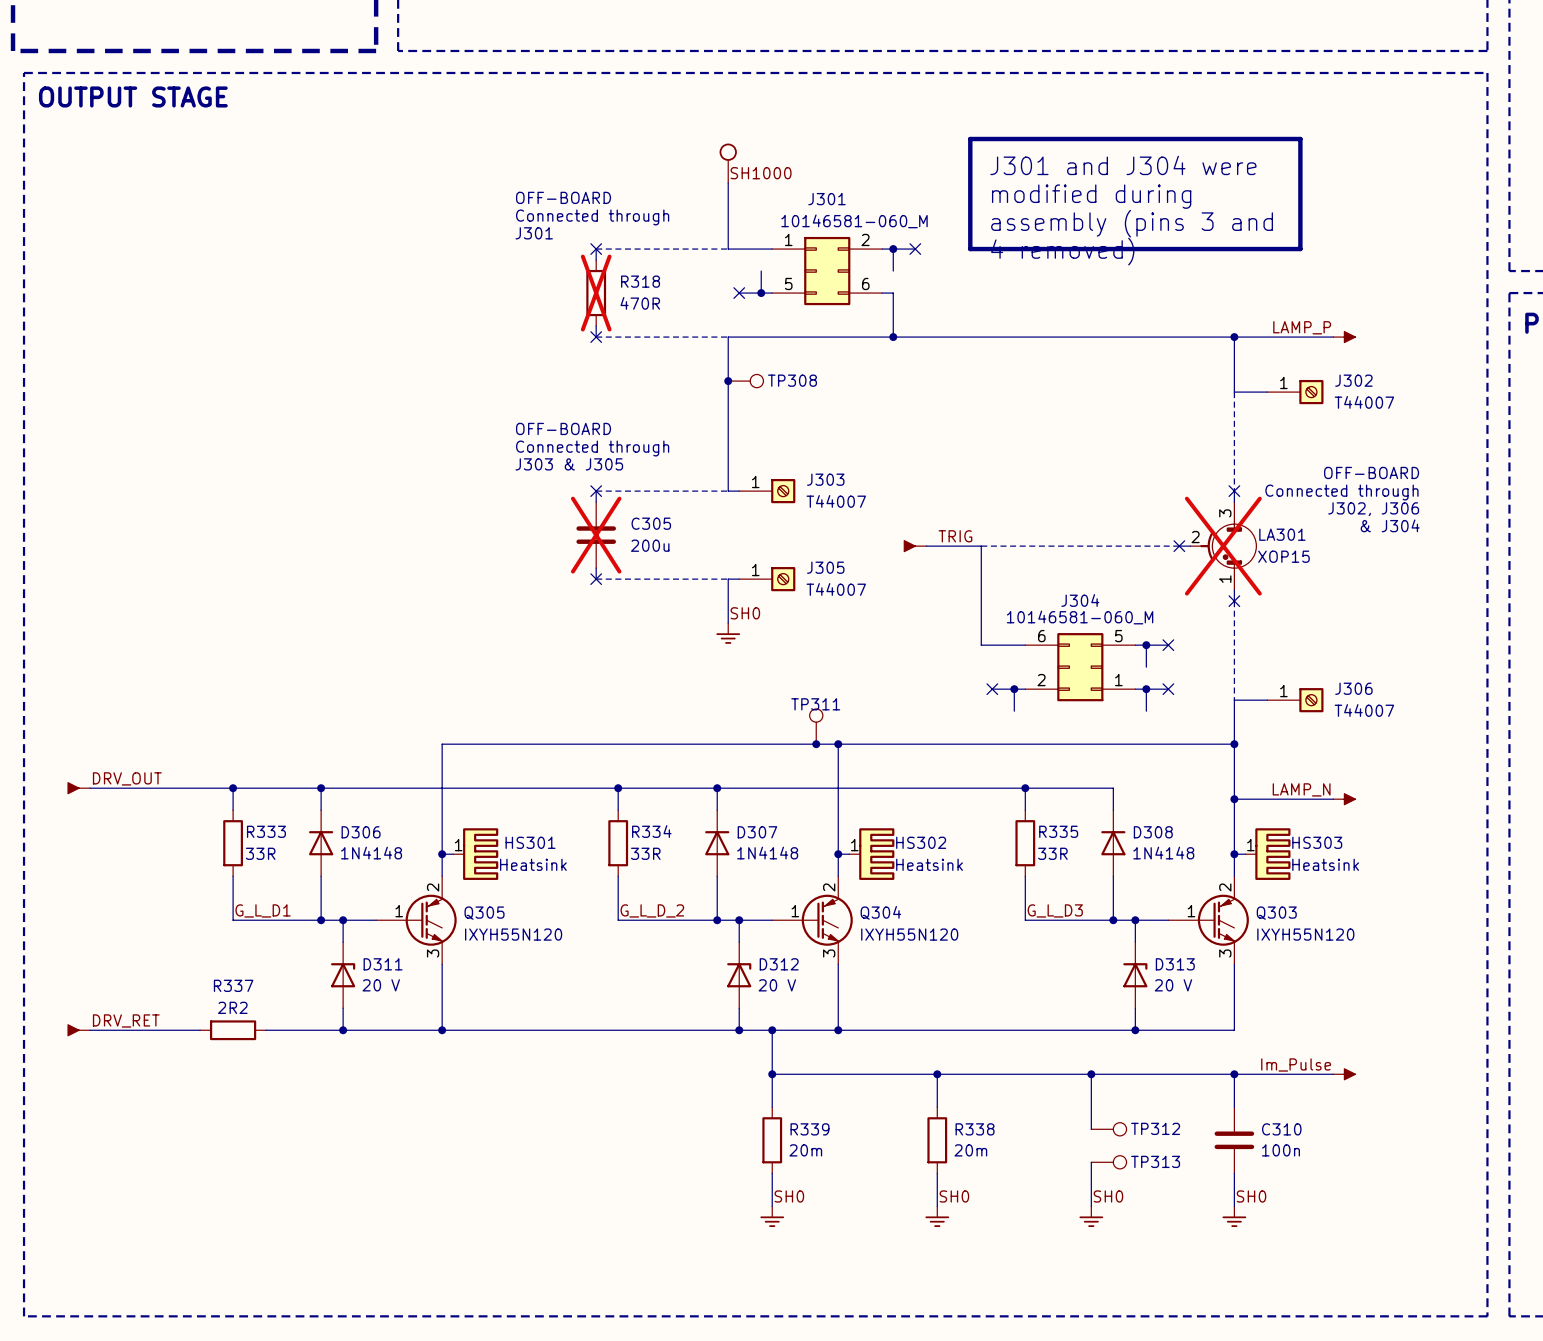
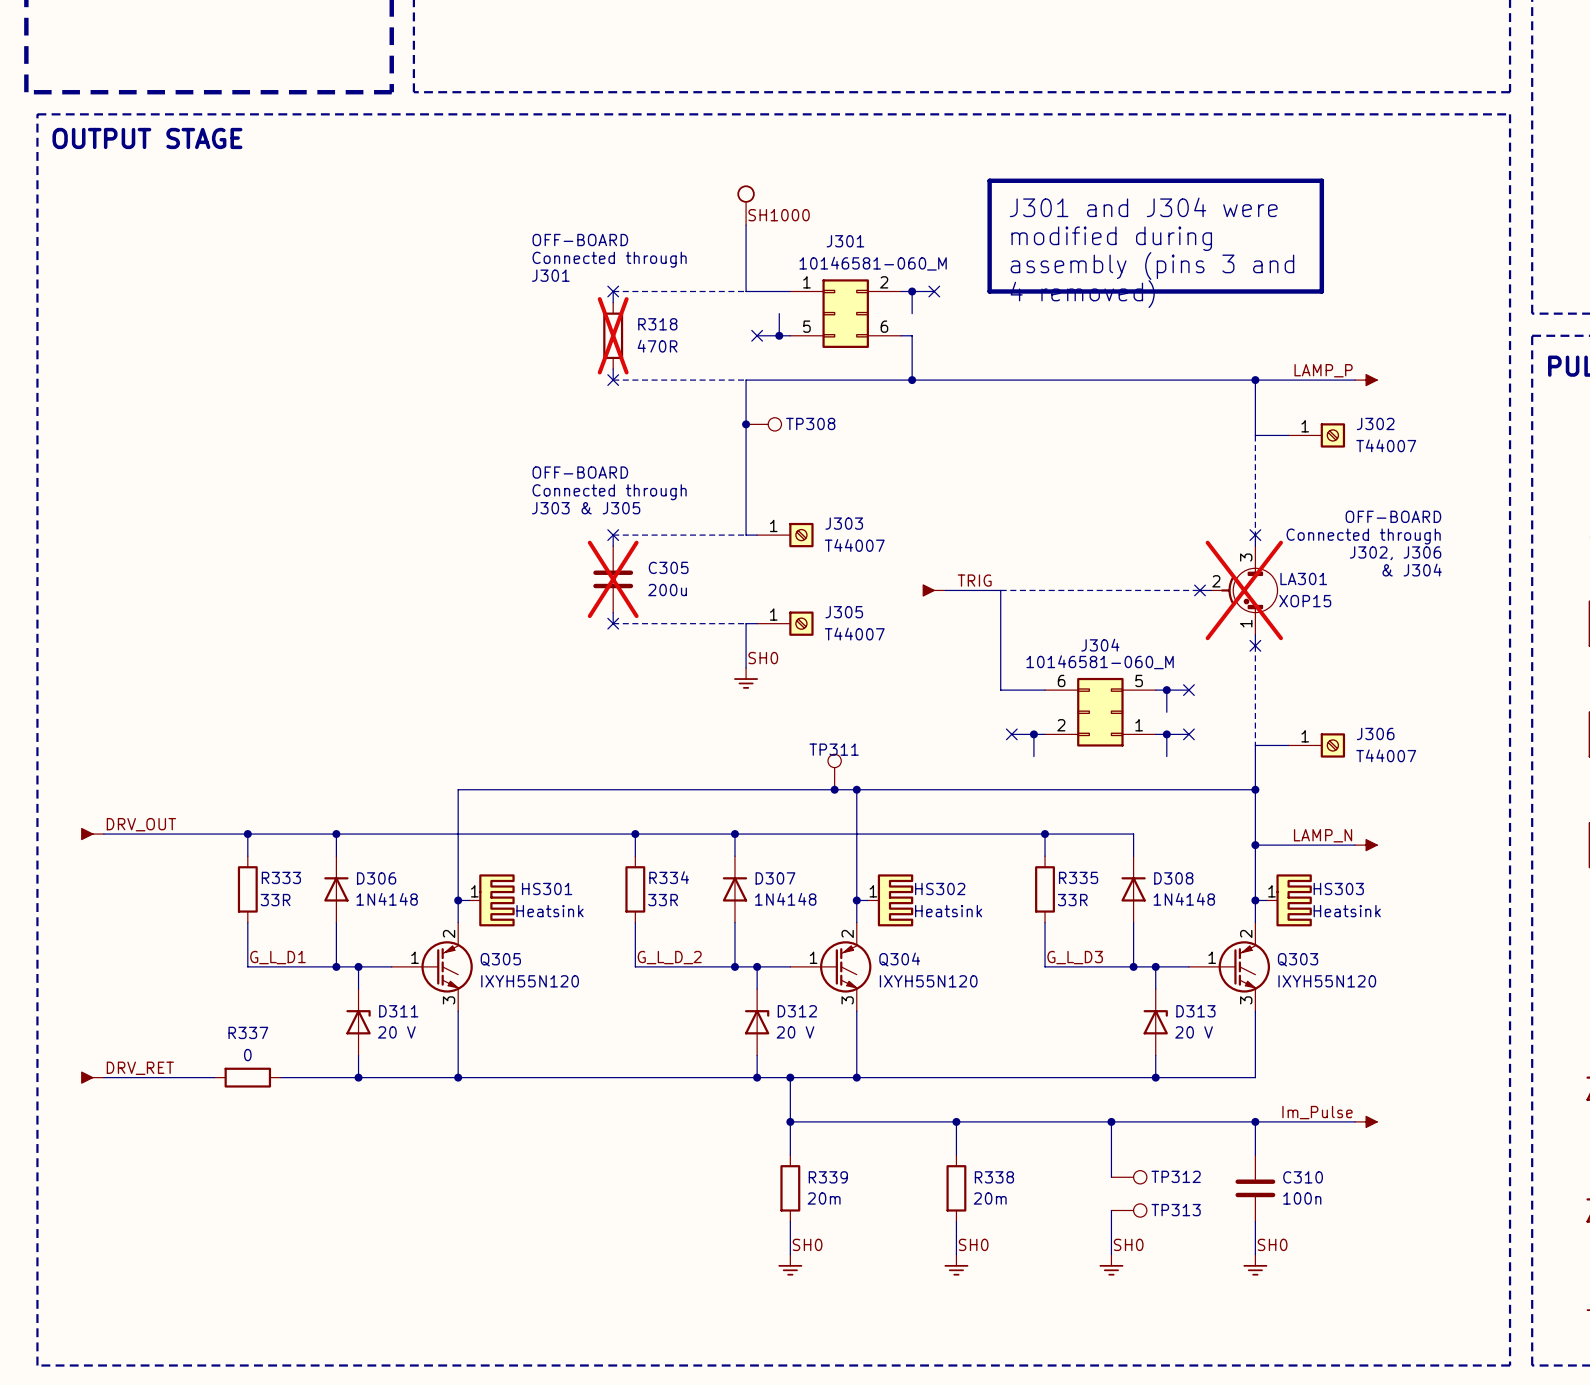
R337 value: 2R2 (232, 1007) -> 0 (247, 1055)

